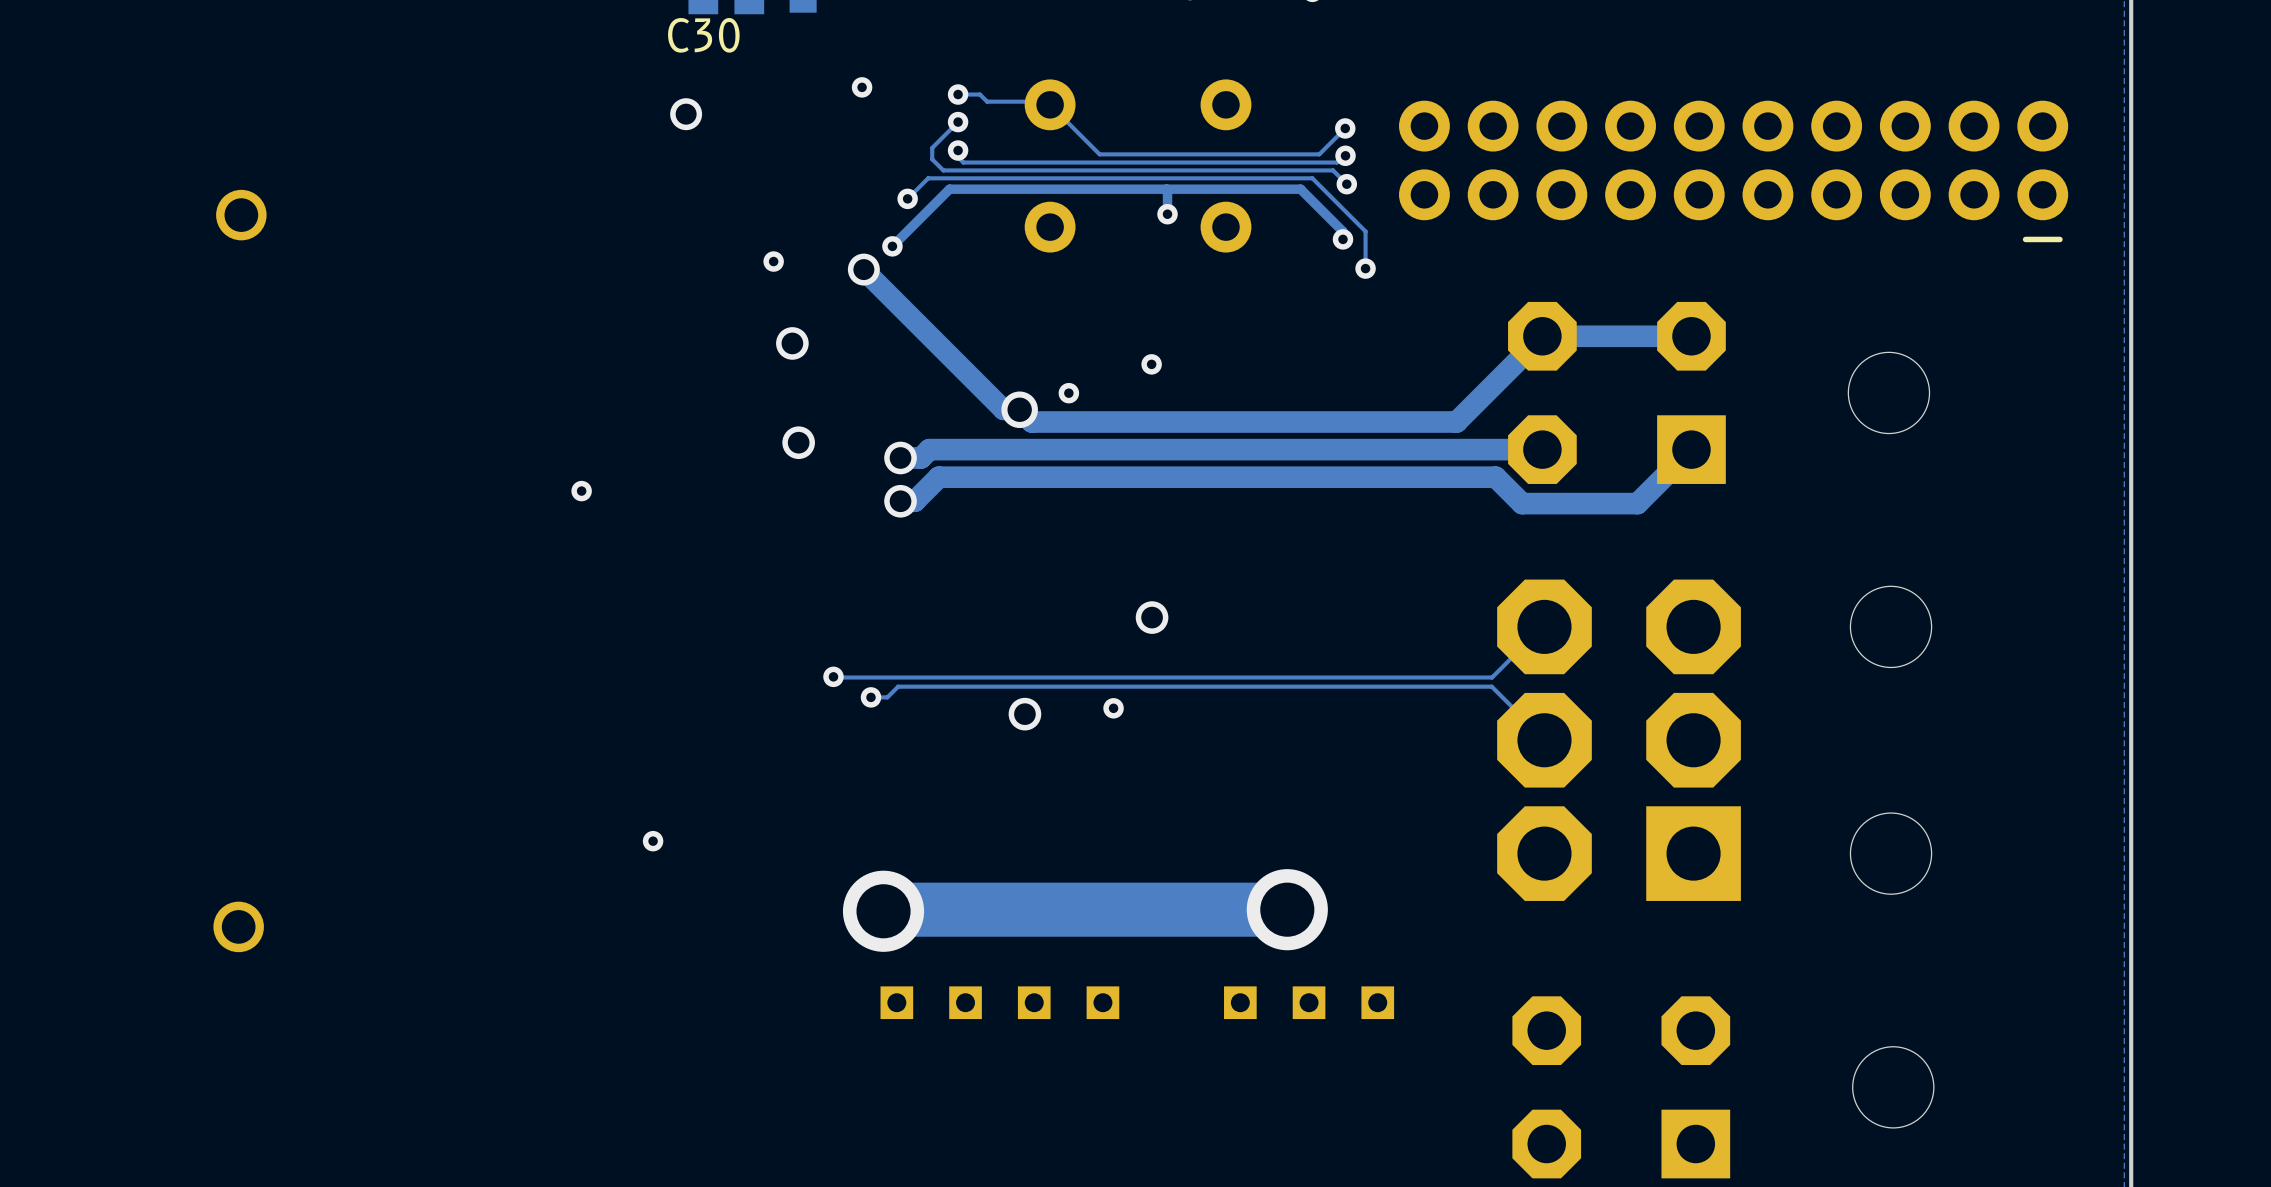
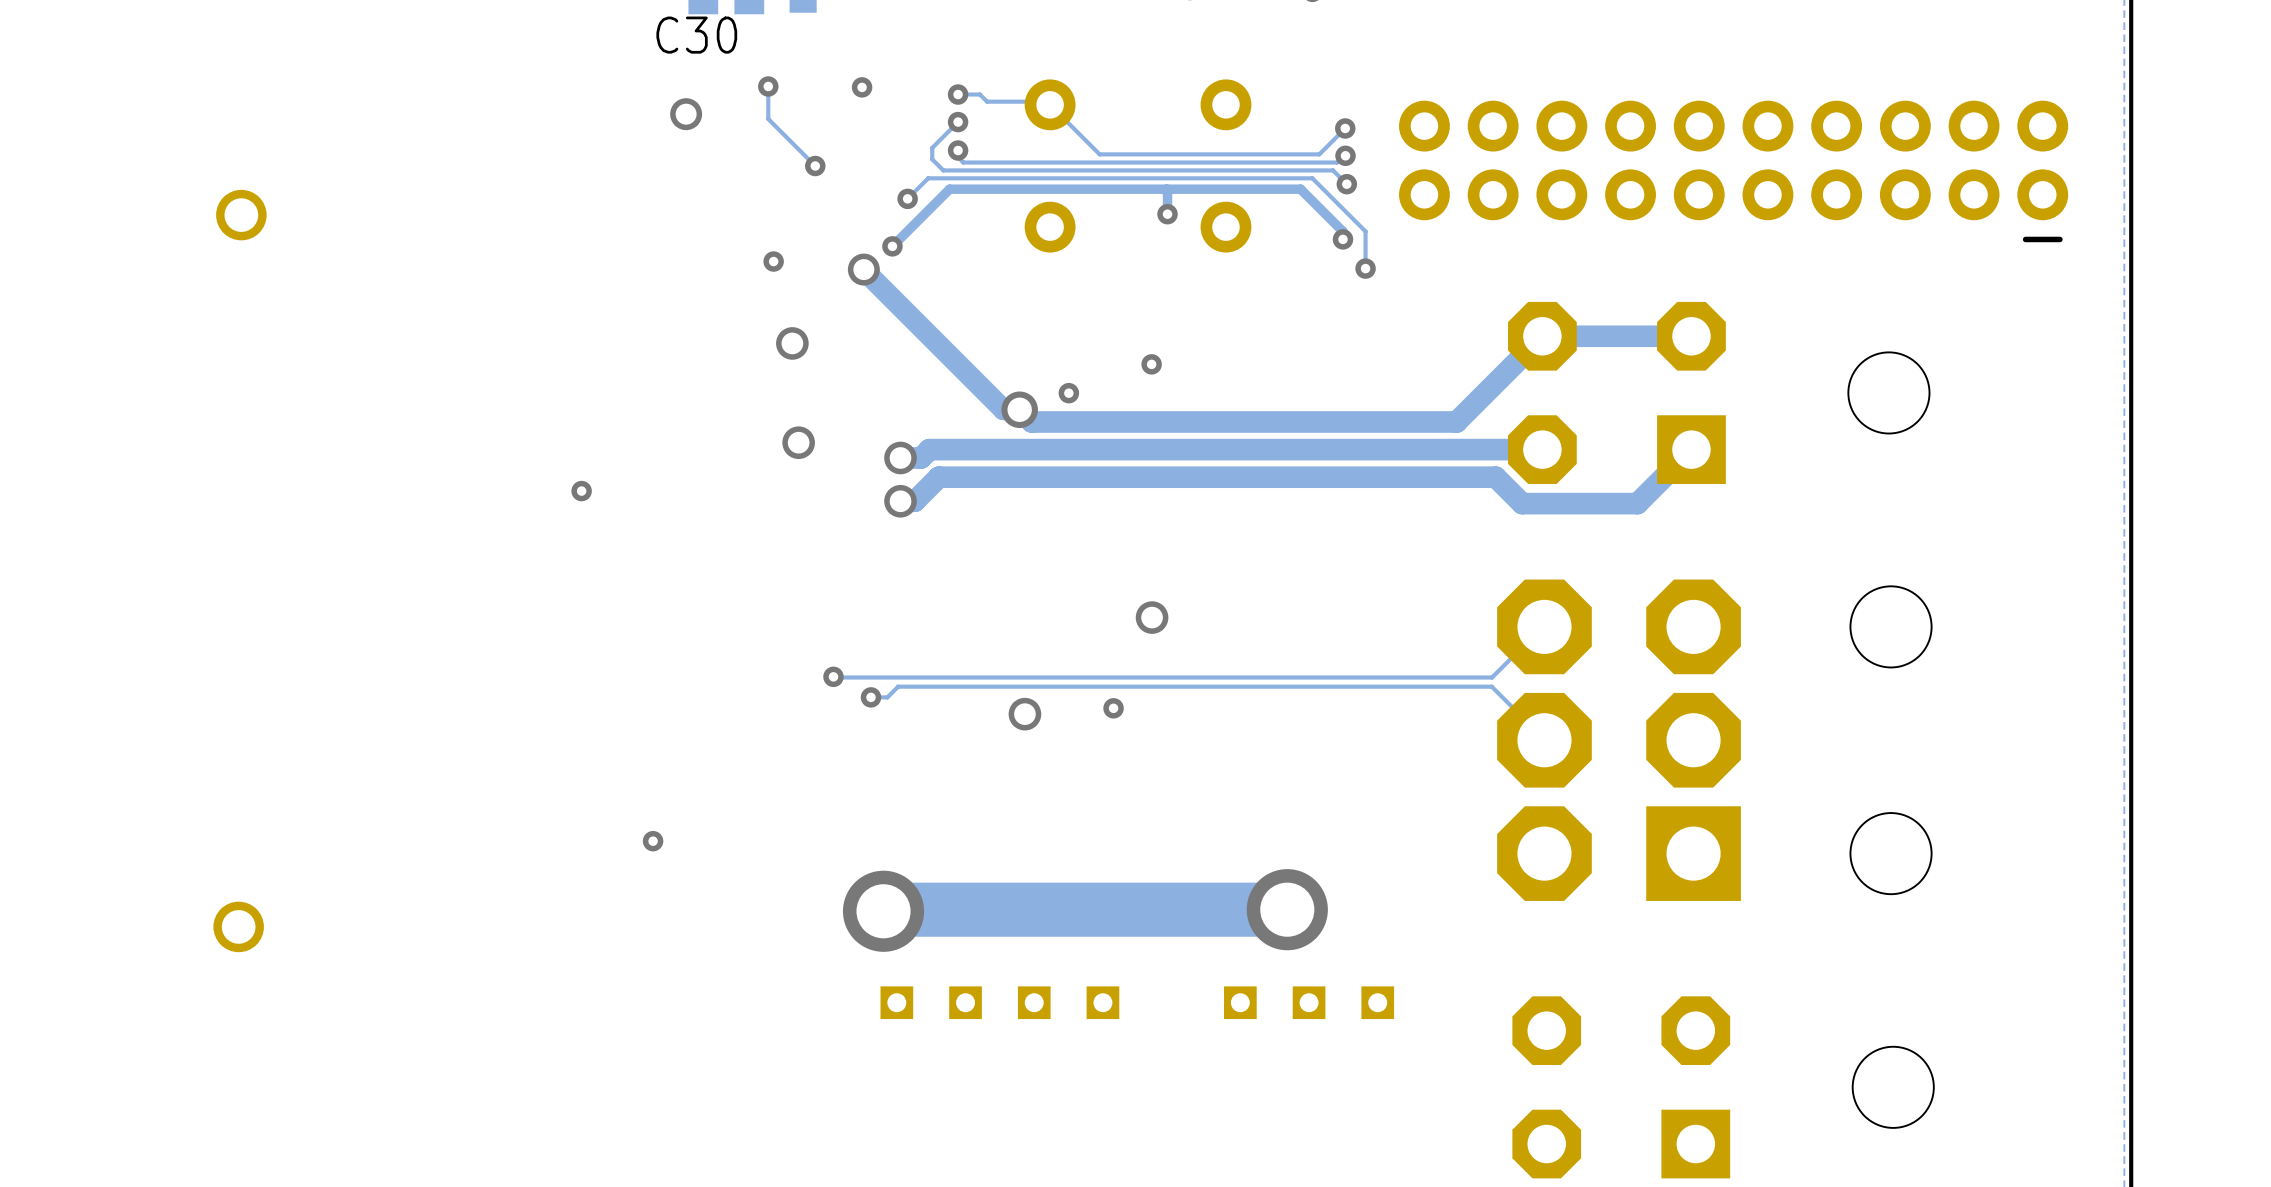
track: none -> (768, 86) (768, 119) (815, 166)
via: none -> (768, 86)
via: none -> (815, 166)

